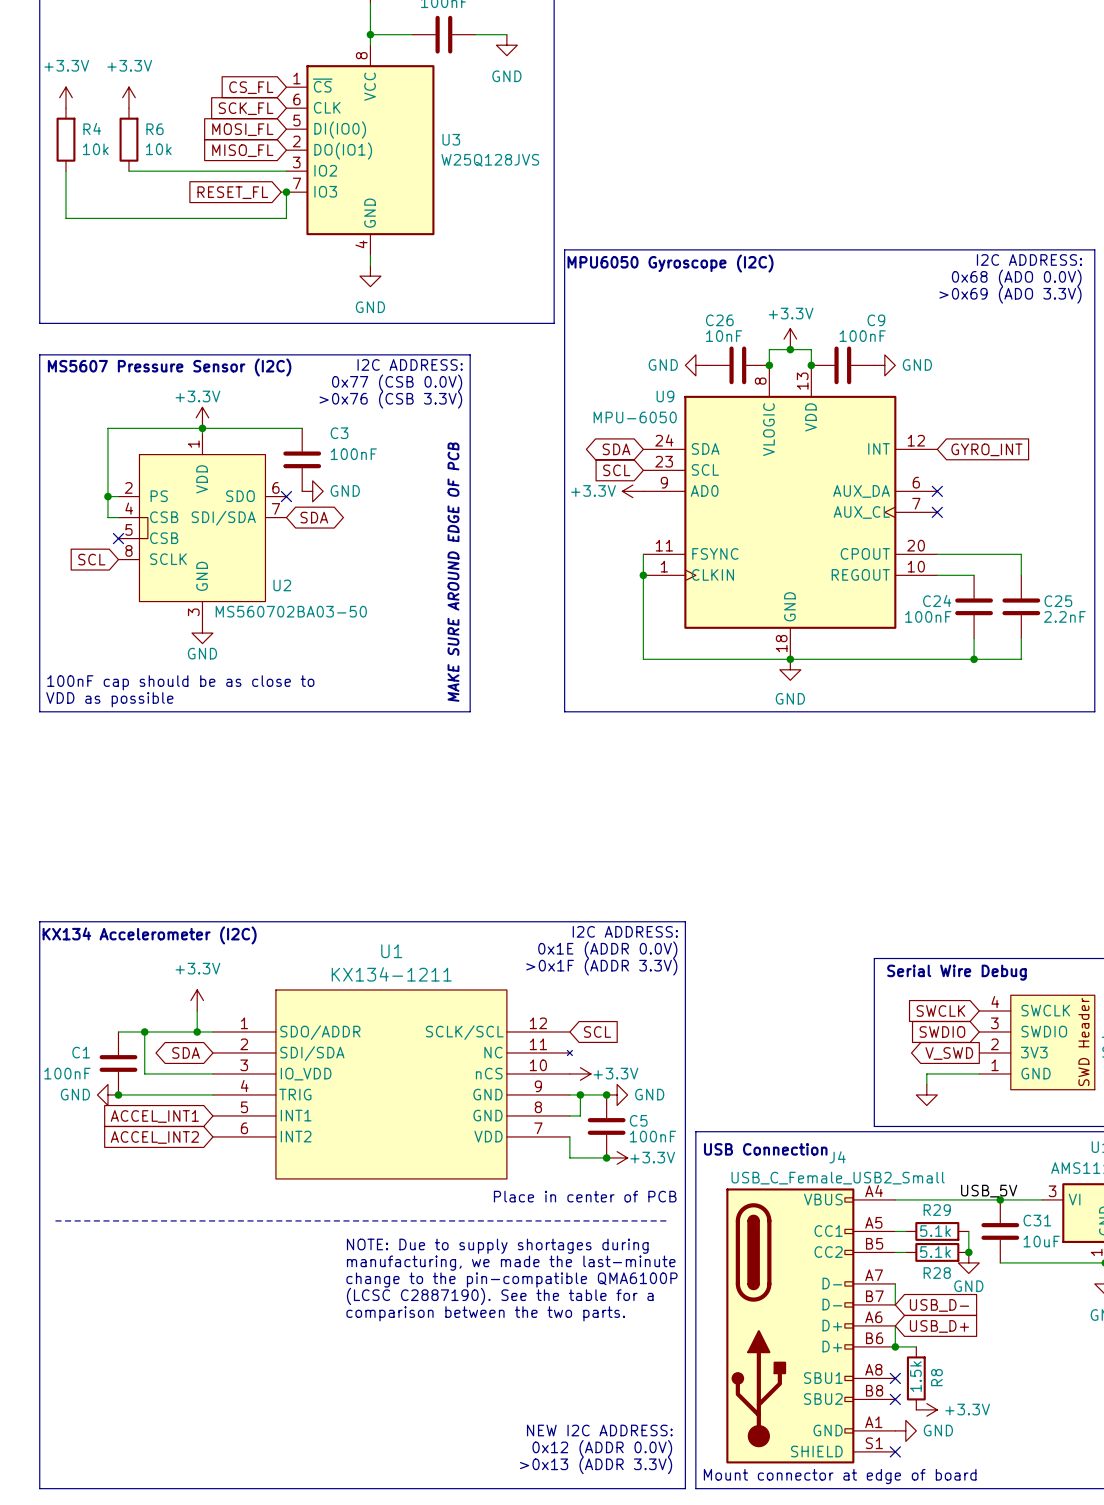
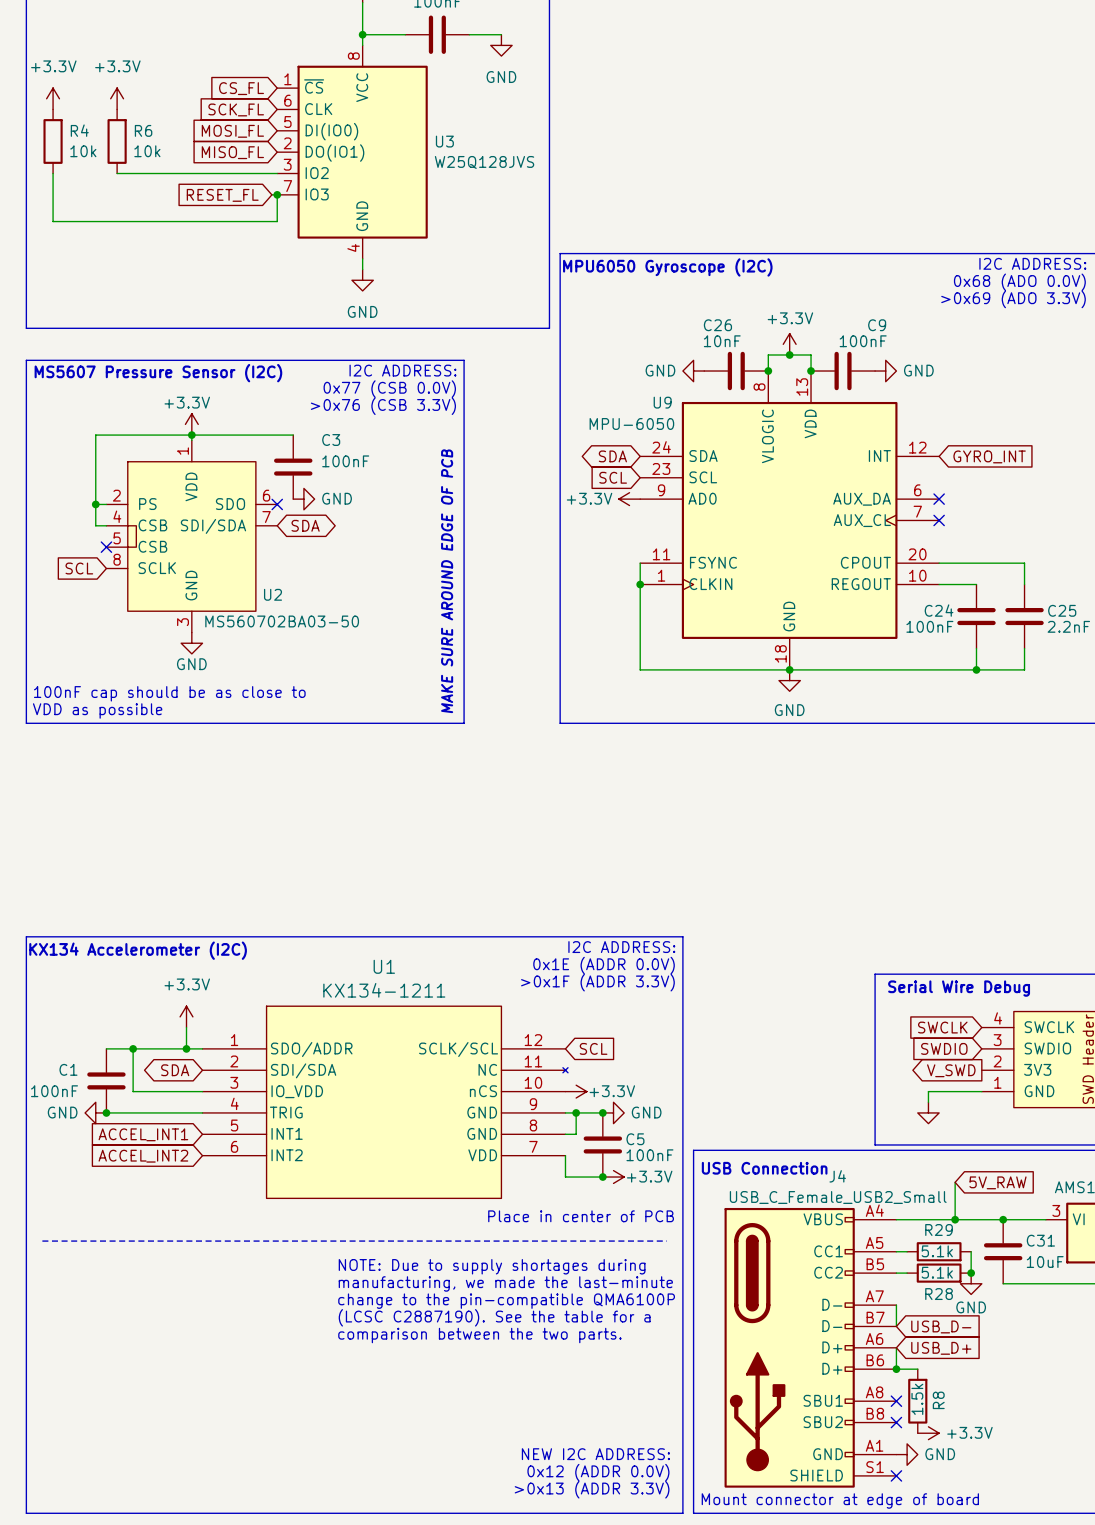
wire: none -> (955, 1182) (955, 1219)
global label: none -> 5V_RAW (997, 1182)
label: USB_5V (989, 1191) -> none
junction: none -> (955, 1219)

